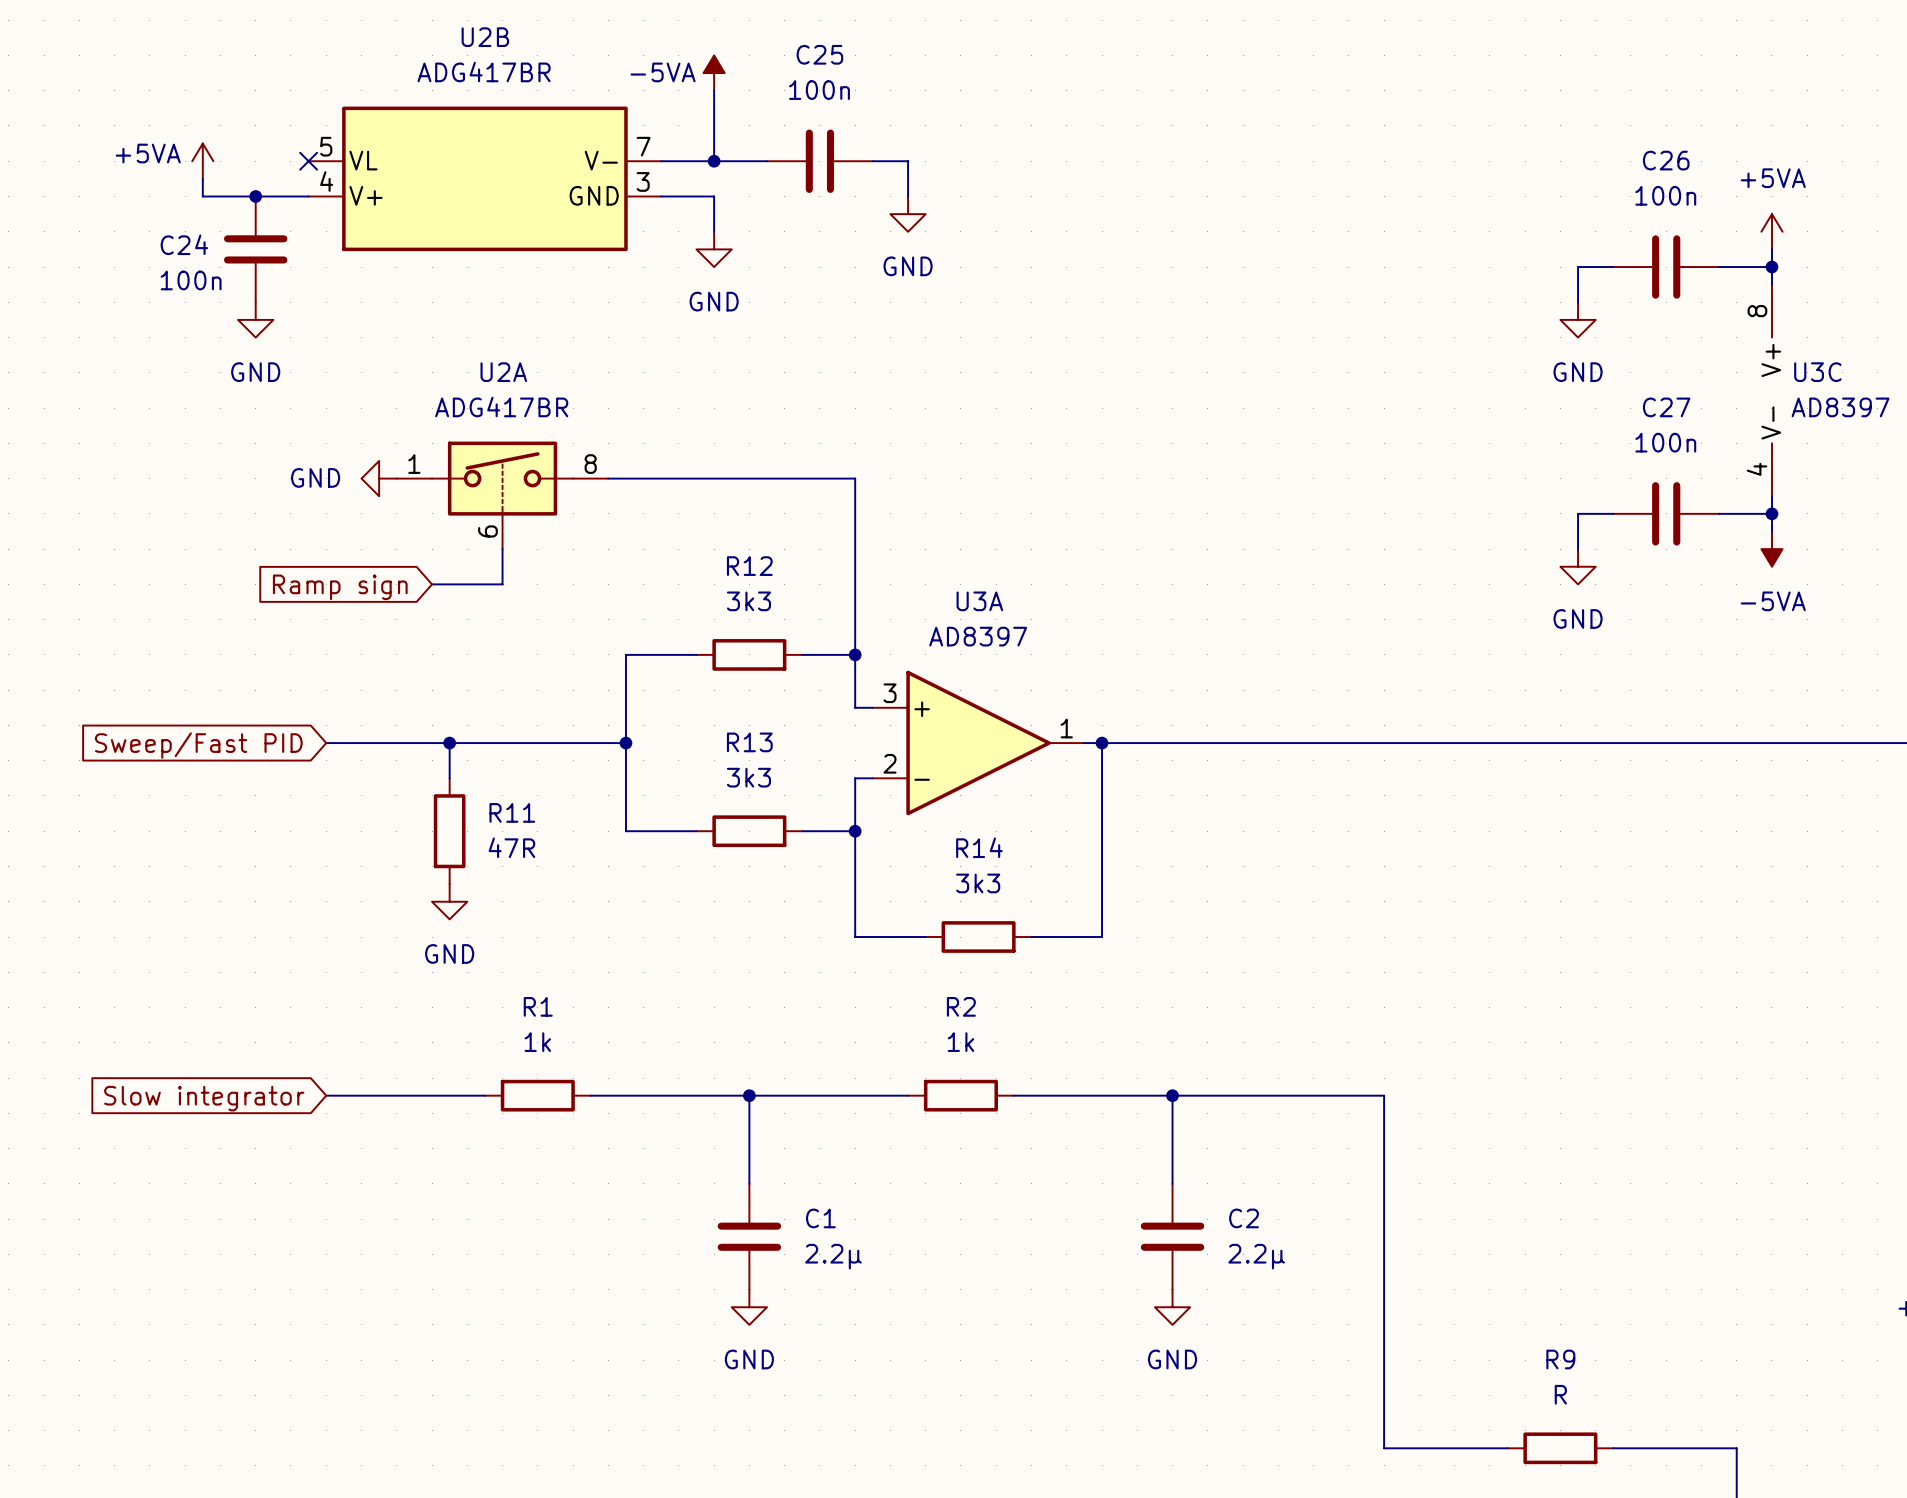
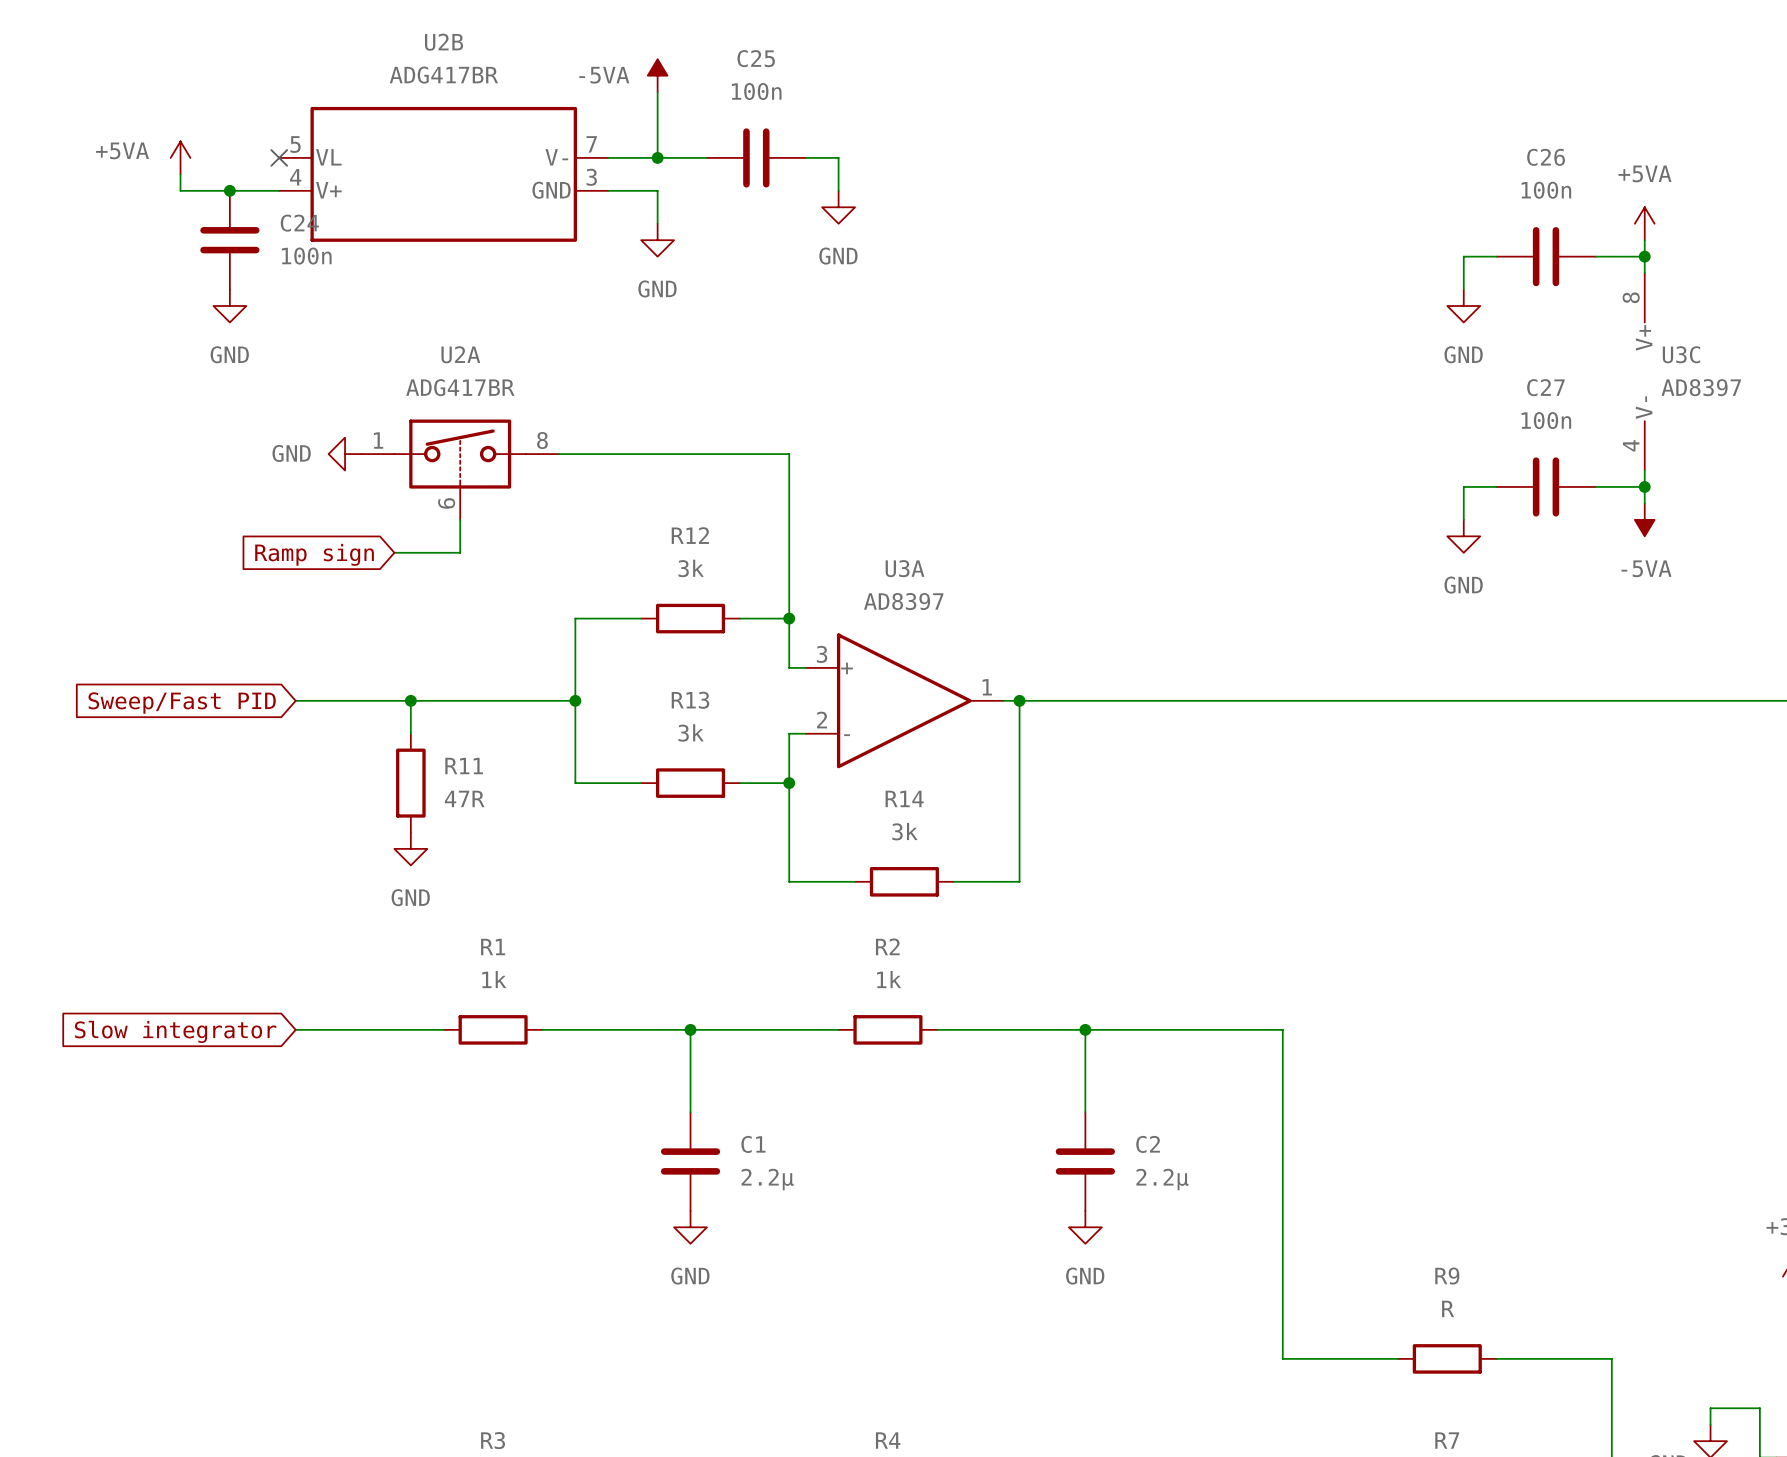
C24 name position: C24 (184, 244) -> C24 (299, 223)
C24 value position: 100n (191, 280) -> 100n (306, 256)
R12 value: 3k3 (748, 601) -> 3k (691, 568)
R13 value: 3k3 (748, 777) -> 3k (691, 732)
R14 value: 3k3 (978, 883) -> 3k (904, 831)

